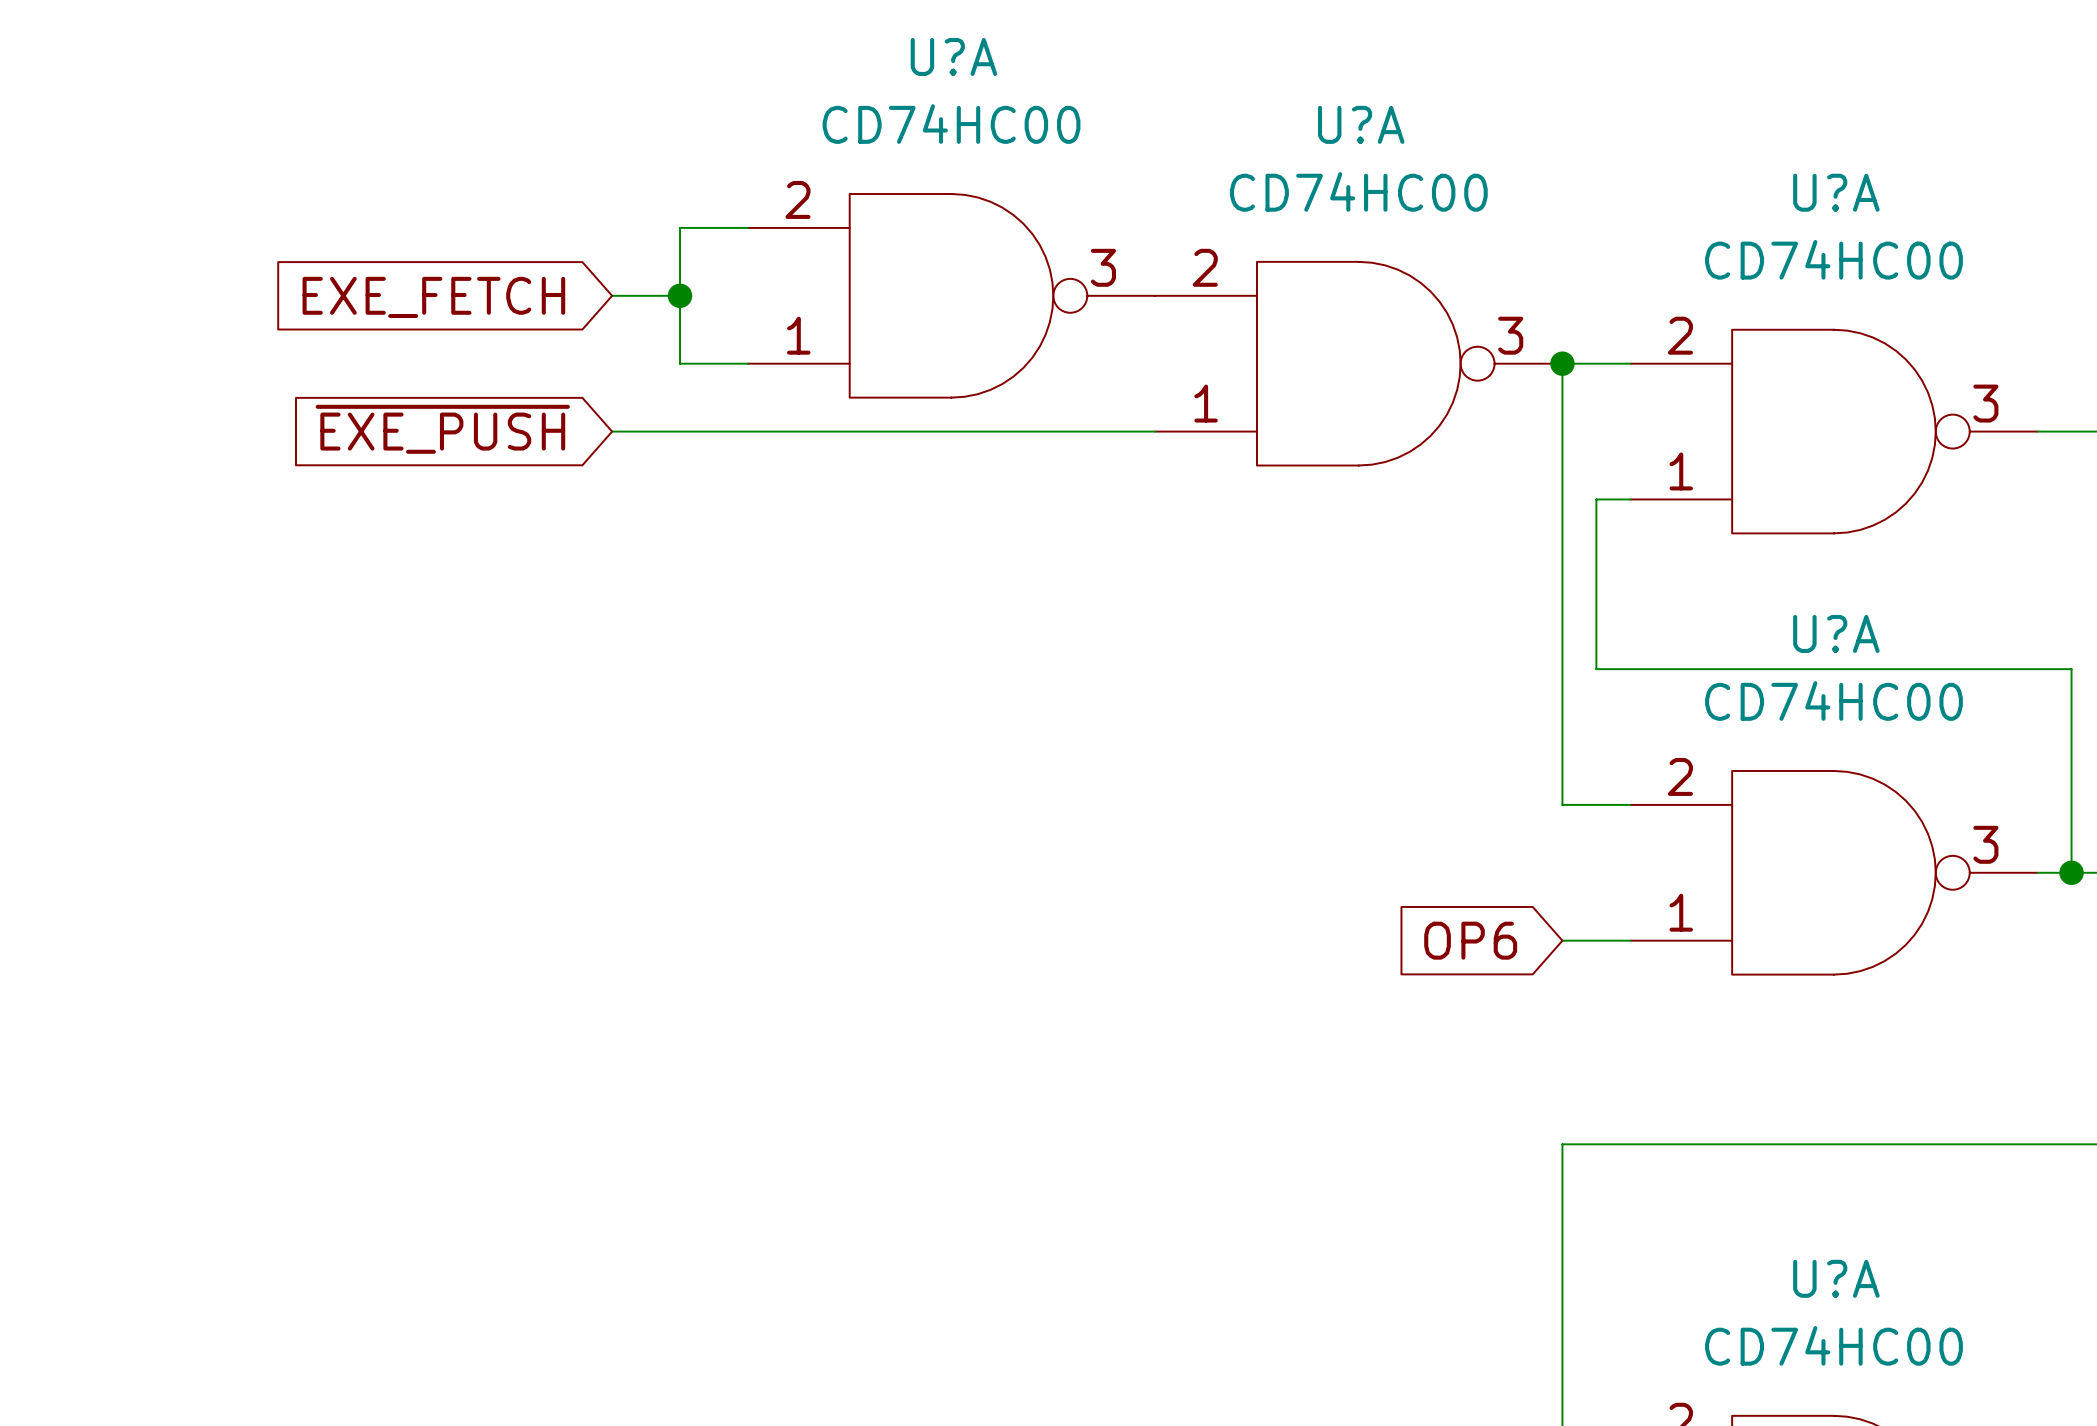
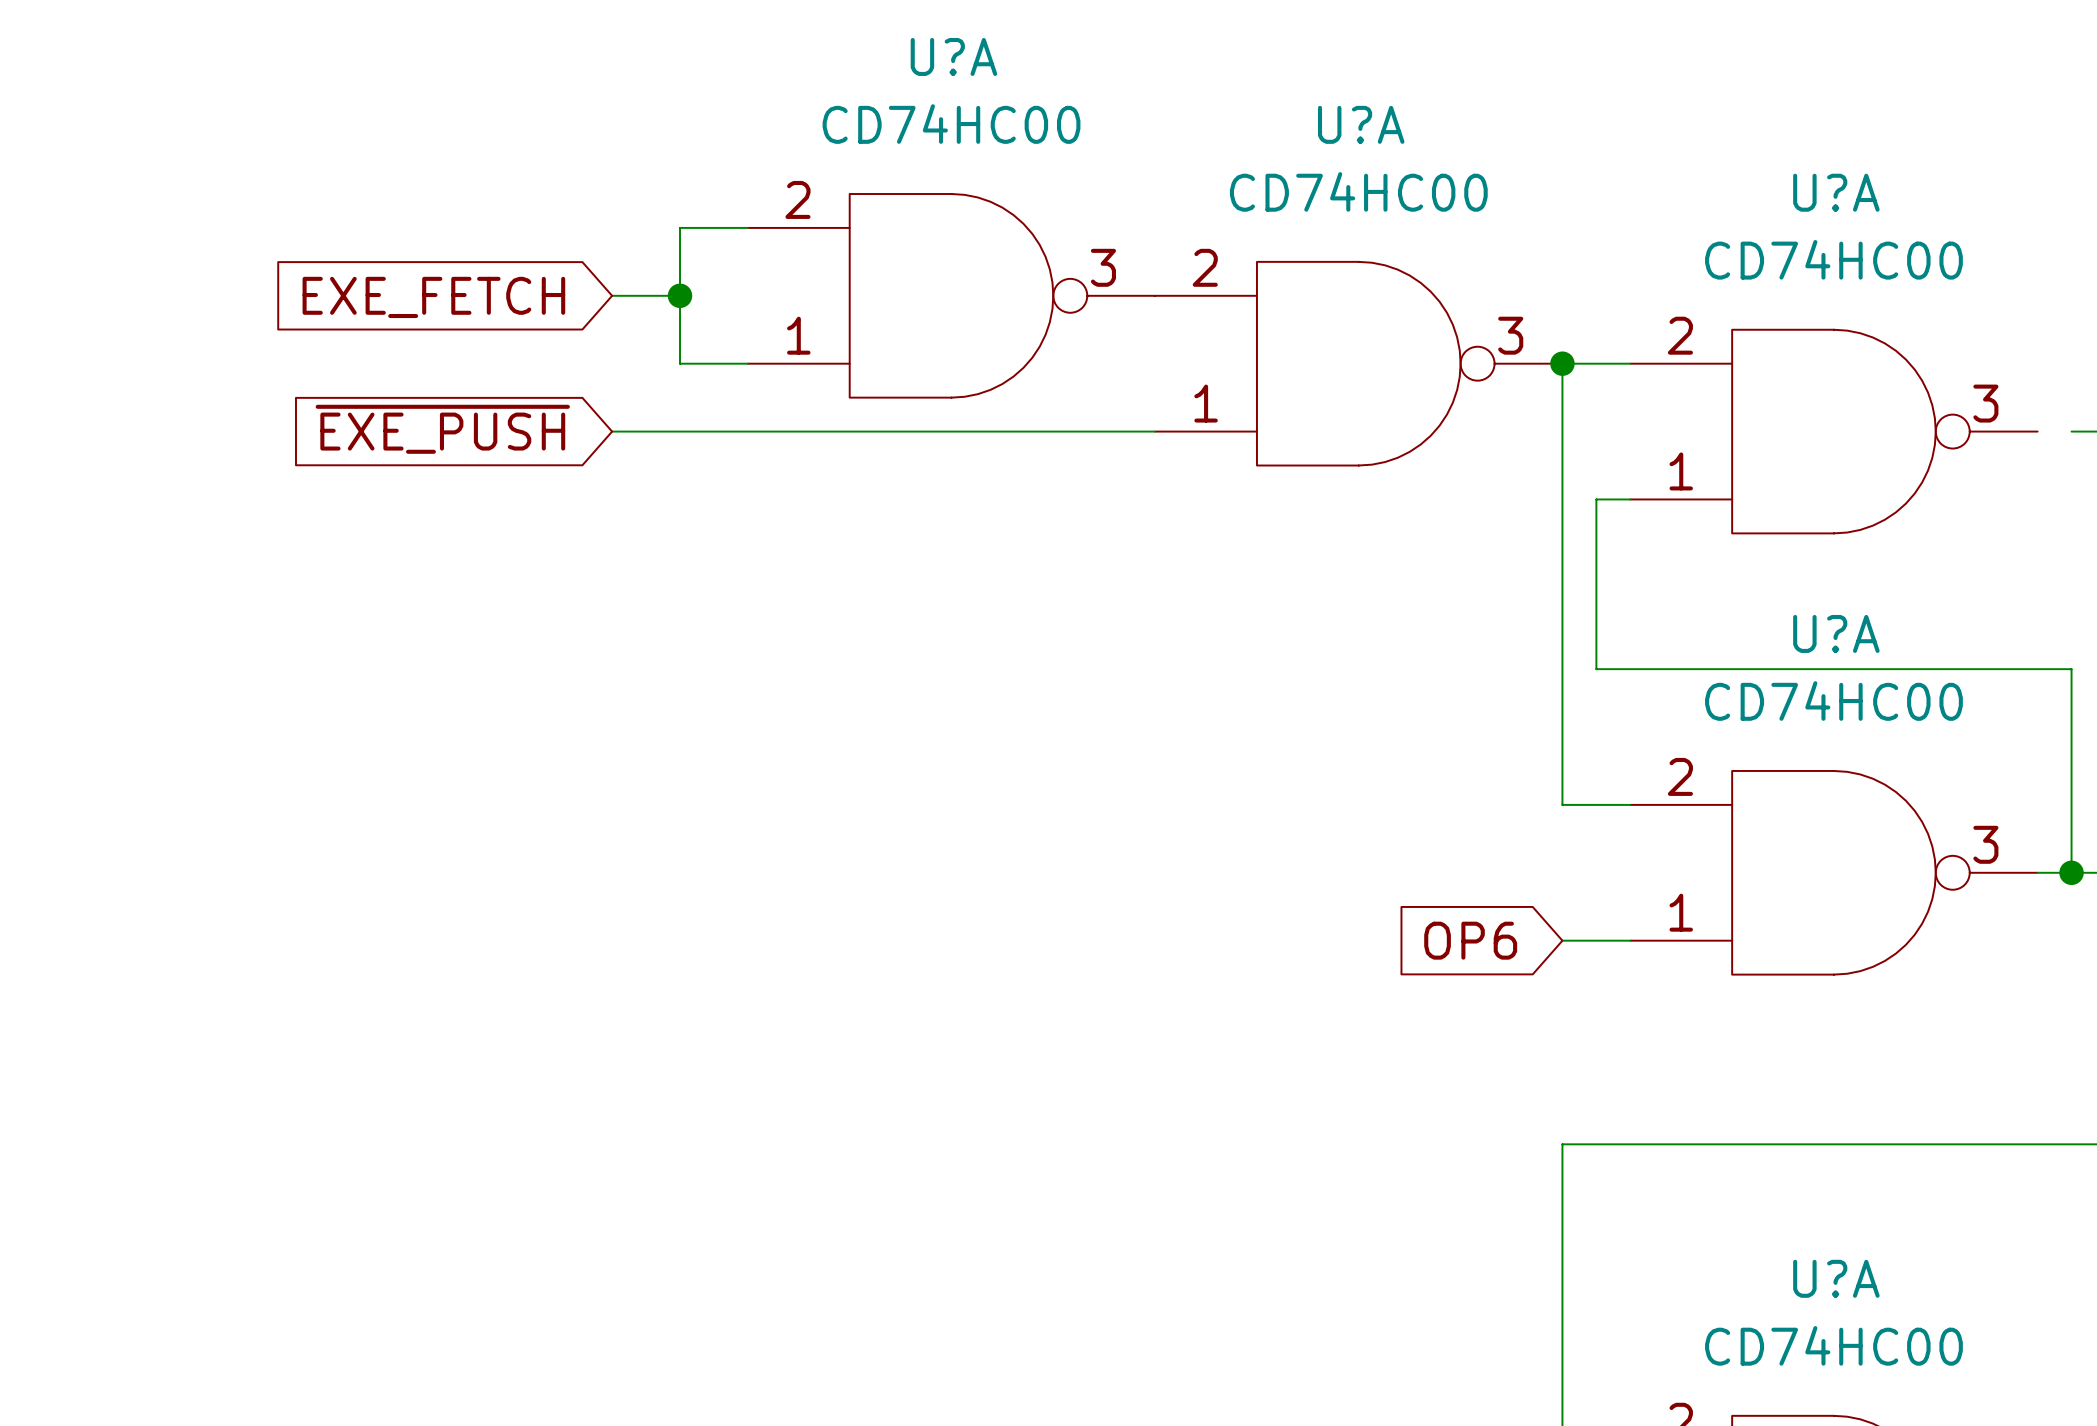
wire: (2037, 431) (2071, 431) -> none

